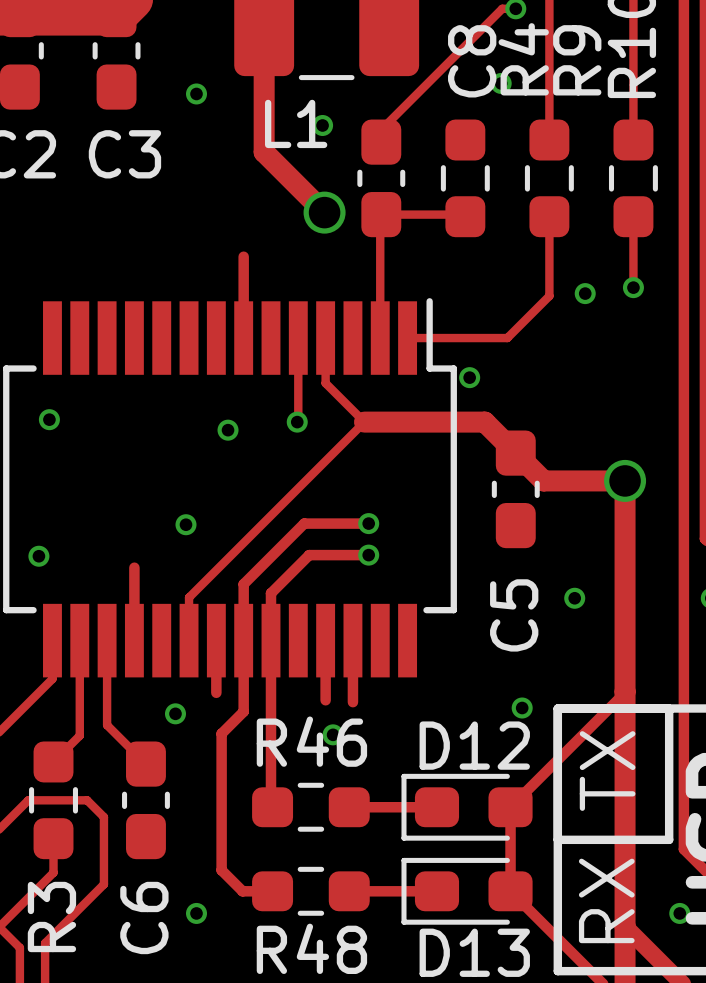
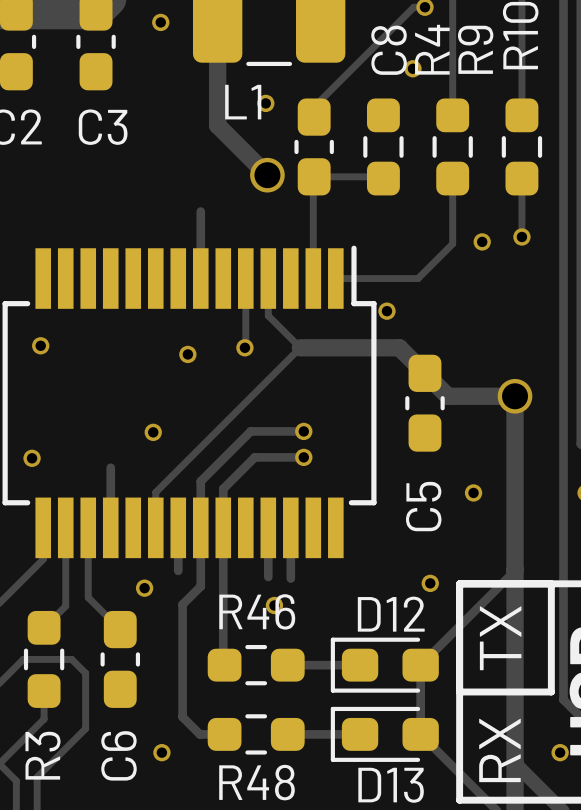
via position: (196, 93) -> (160, 22)

